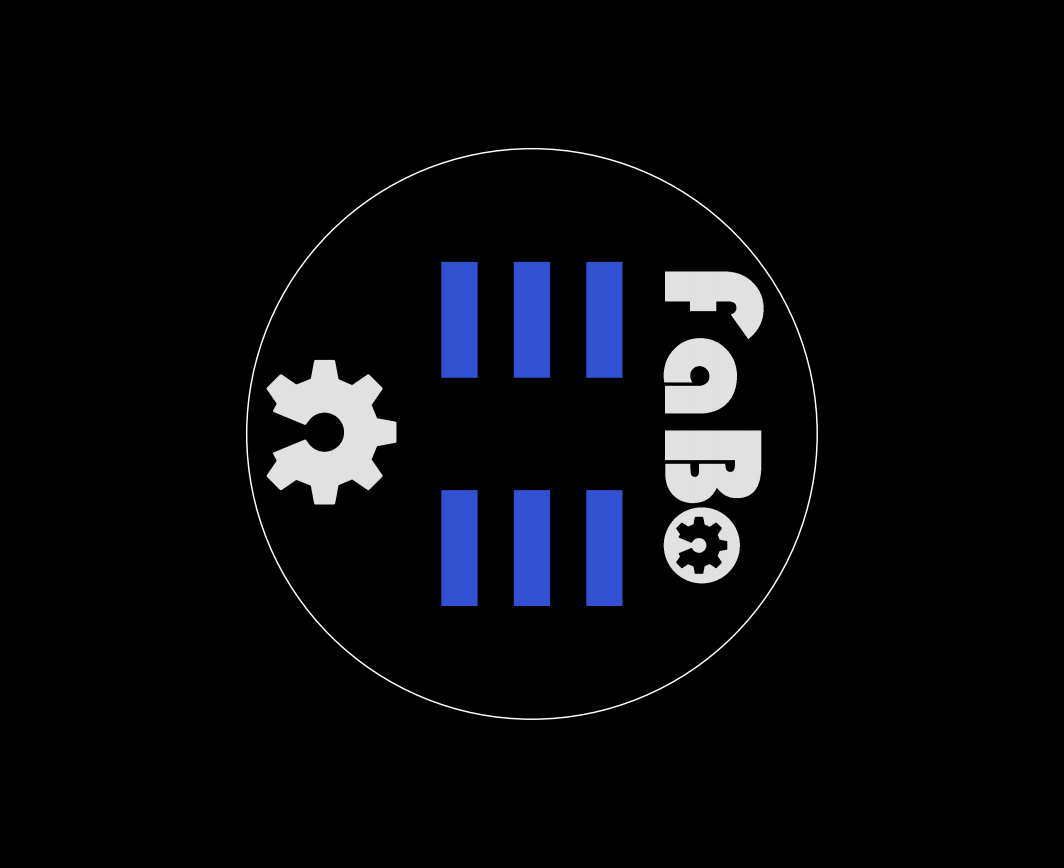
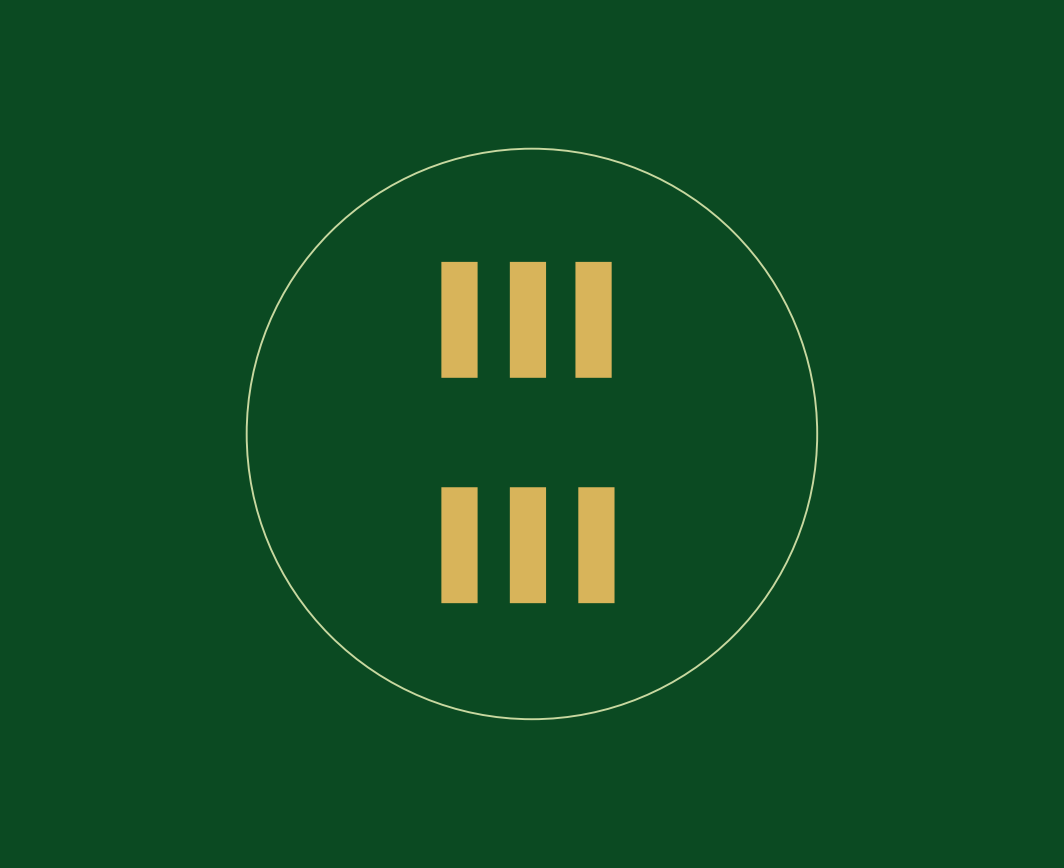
part footprint: [246, 148, 818, 720] -> [245, 147, 818, 720]
drawing: [663, 271, 764, 584] -> none
drawing: [266, 359, 397, 505] -> none

